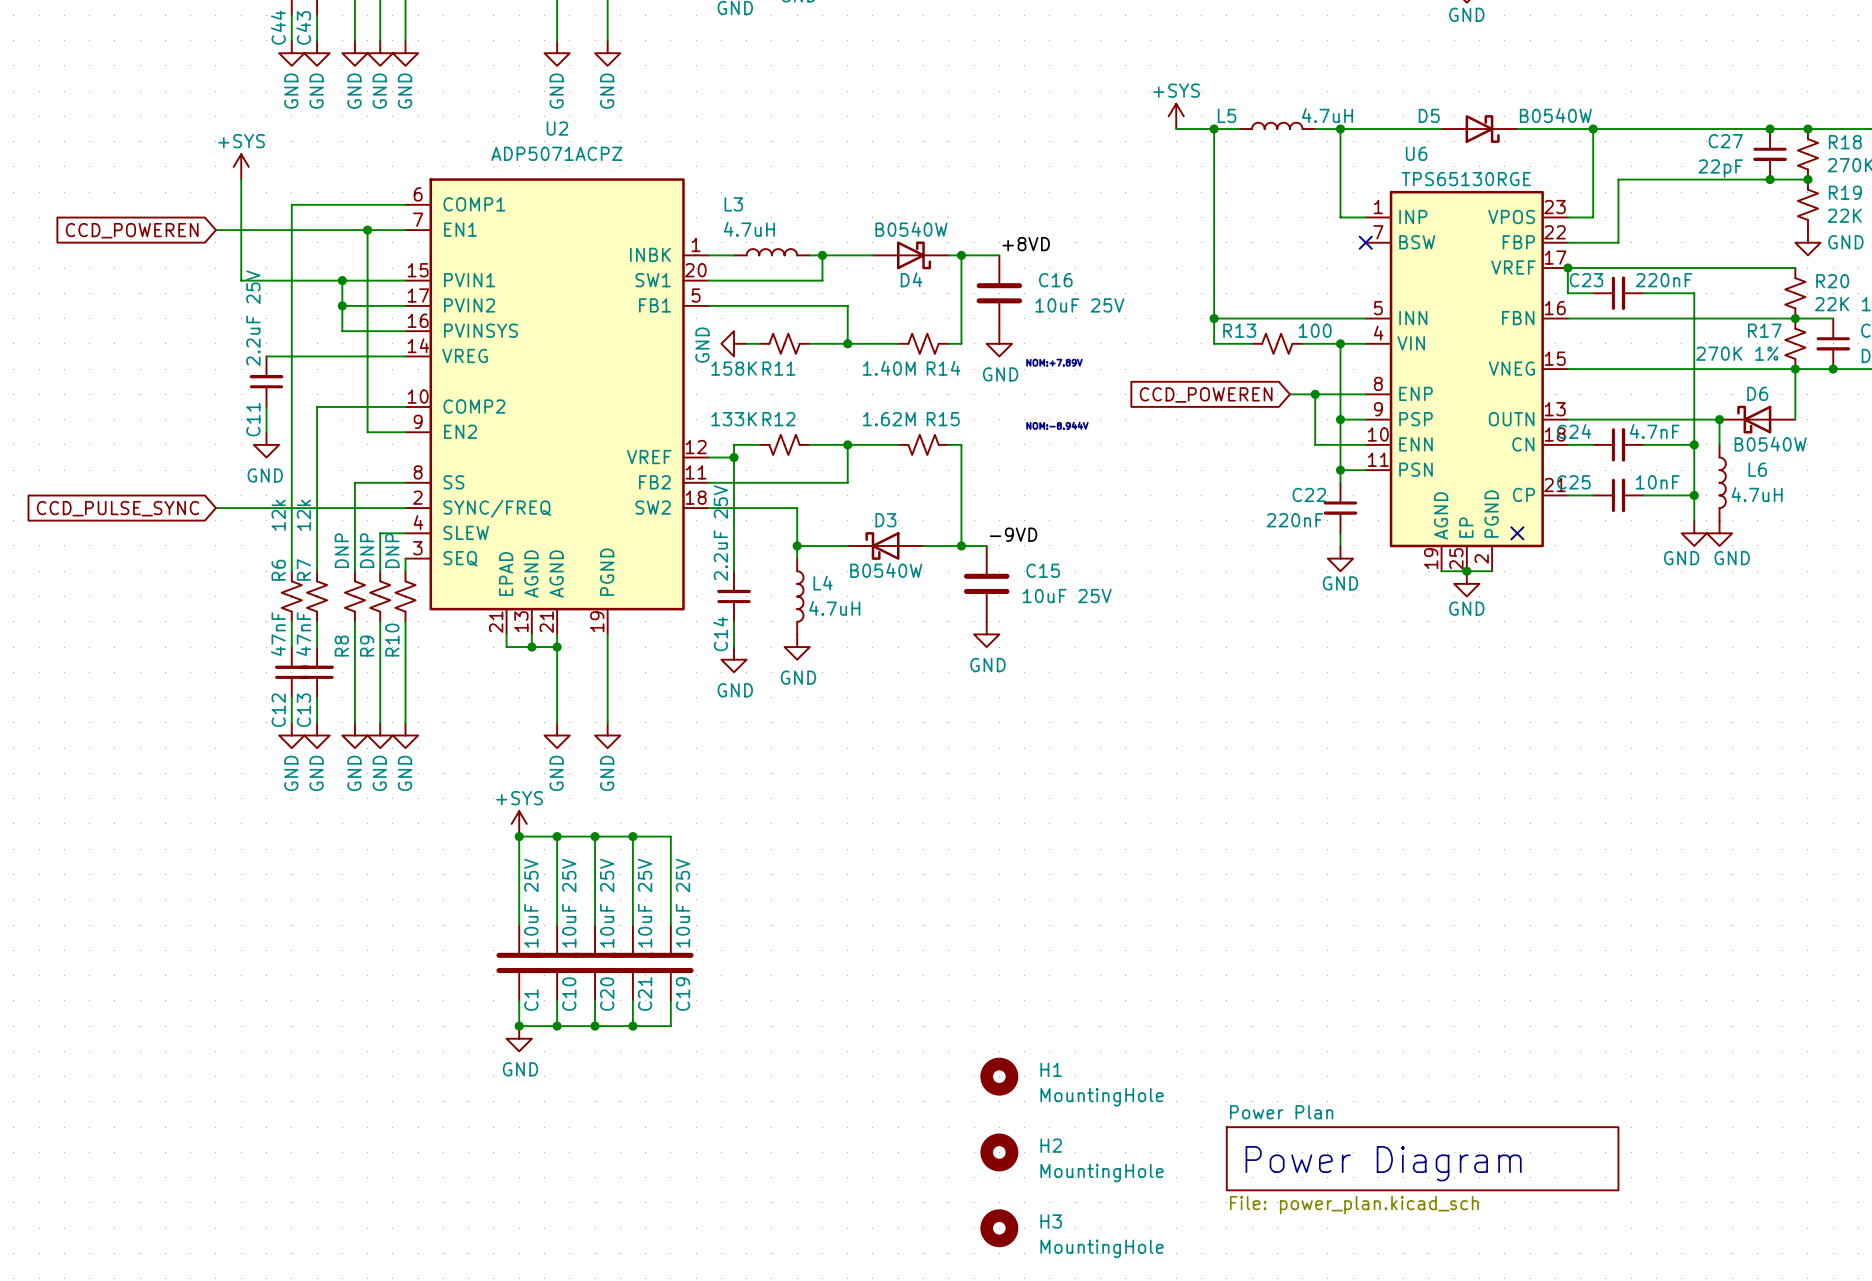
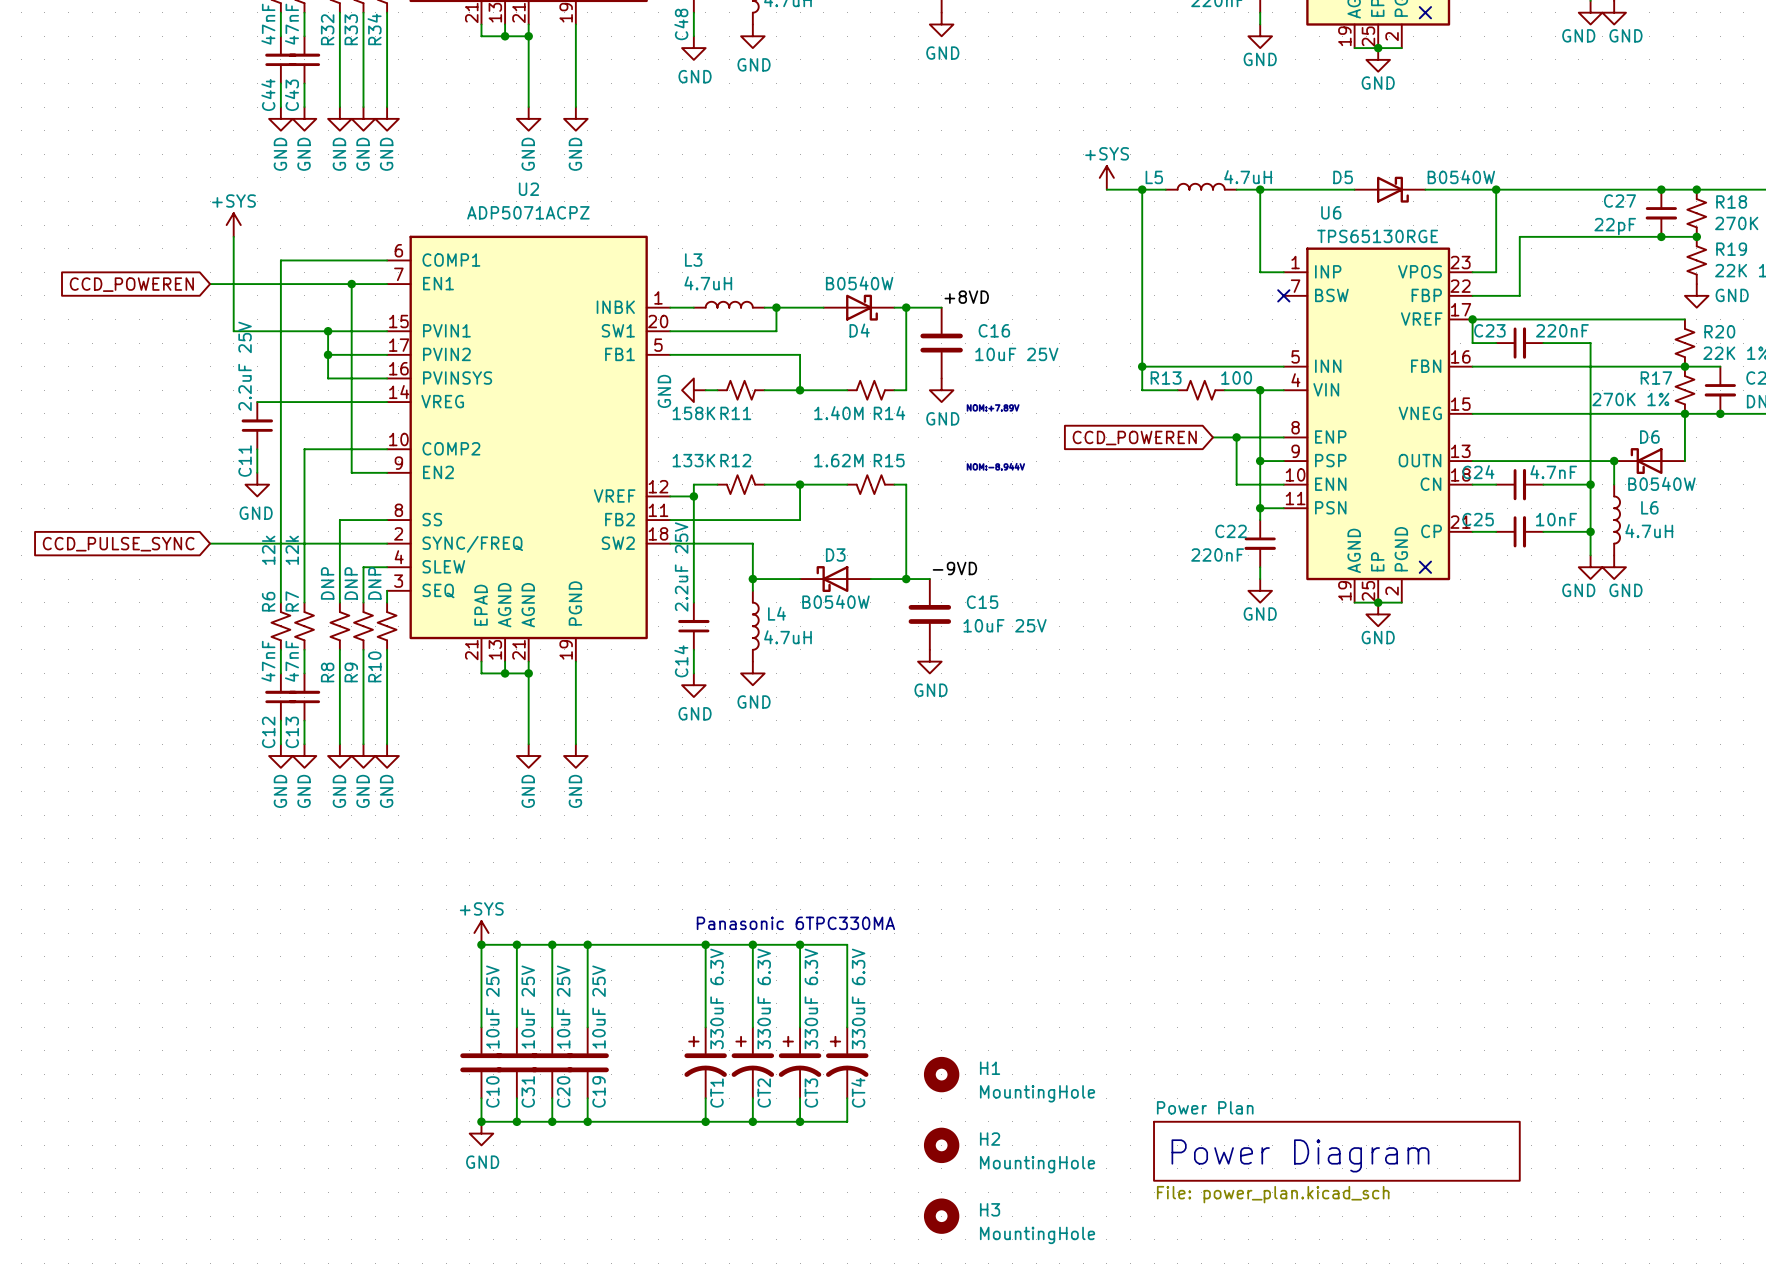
power symbol position: +SYS (519, 823) -> +SYS (481, 933)
junction: (519, 836) -> none
wire: (557, 836) (557, 925) -> (516, 944) (516, 1027)
junction: (557, 836) -> none
wire: (595, 836) (595, 925) -> (552, 944) (552, 1027)
junction: (595, 836) -> none
wire: (632, 836) (632, 925) -> (587, 944) (587, 1027)
junction: (632, 836) -> none
text: none -> Panasonic 6TPC330MA (795, 923)
wire: (519, 925) (519, 836) (670, 836) (670, 925) -> none
junction: none -> (481, 944)
junction: none -> (516, 944)
junction: none -> (552, 944)
junction: none -> (587, 944)
wire: none -> (705, 944) (705, 1027)
junction: none -> (705, 944)
wire: none -> (752, 944) (752, 1027)
junction: none -> (752, 944)
wire: none -> (800, 944) (800, 1027)
junction: none -> (800, 944)
C1: 10uF 25V (519, 962) -> none
C10 position: (557, 962) -> (481, 1062)
C20 position: (595, 962) -> (552, 1062)
C21: 10uF 25V (632, 962) -> none
C19 position: (670, 962) -> (587, 1062)
wire: (519, 1000) (519, 1026) (670, 1026) (670, 1000) -> none
wire: (557, 1000) (557, 1026) -> (516, 1098) (516, 1121)
wire: (595, 1000) (595, 1026) -> (552, 1098) (552, 1121)
wire: (632, 1000) (632, 1026) -> (587, 1098) (587, 1121)
wire: none -> (481, 1027) (481, 944) (847, 944) (847, 1027)
junction: (519, 1026) -> none
junction: (557, 1026) -> none
junction: (595, 1026) -> none
junction: (632, 1026) -> none
power symbol position: GND (519, 1038) -> GND (481, 1133)
C31: none -> 10uF 25V (516, 1062)
CT1: none -> 330uF 6.3V (705, 1062)
CT2: none -> 330uF 6.3V (752, 1062)
CT3: none -> 330uF 6.3V (800, 1062)
CT4: none -> 330uF 6.3V (847, 1062)
wire: none -> (481, 1098) (481, 1121) (847, 1121) (847, 1098)
wire: none -> (705, 1098) (705, 1121)
wire: none -> (752, 1098) (752, 1121)
wire: none -> (800, 1098) (800, 1121)
junction: none -> (481, 1121)
junction: none -> (516, 1121)
junction: none -> (552, 1121)
junction: none -> (587, 1121)
junction: none -> (705, 1121)
junction: none -> (752, 1121)
junction: none -> (800, 1121)

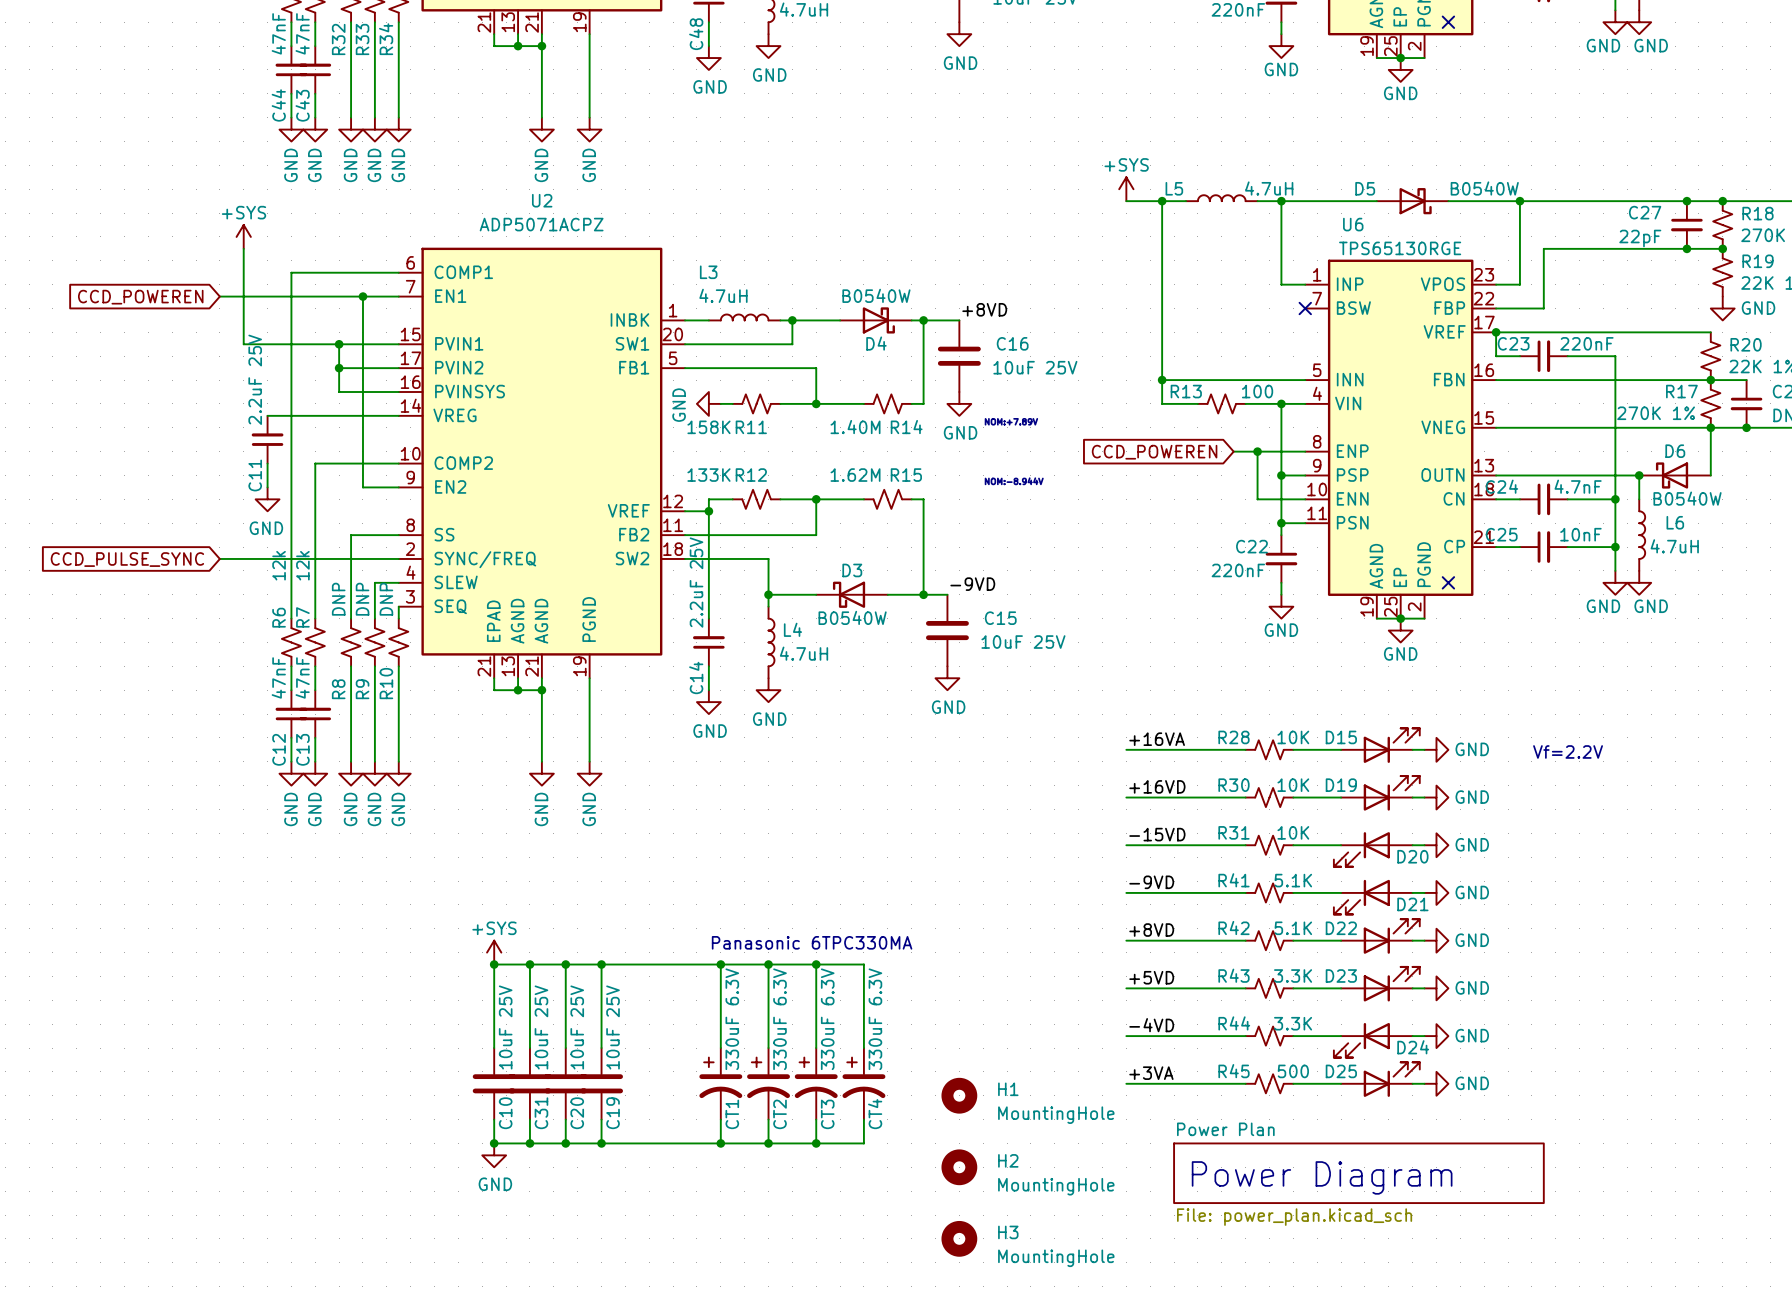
label: none -> +16VA (1157, 739)
D15: none -> (1380, 745)
wire: none -> (1126, 749) (1245, 749)
R28: none -> 10K (1269, 749)
wire: none -> (1293, 749) (1341, 749)
wire: none -> (1412, 749) (1424, 749)
power symbol: none -> GND (1436, 749)
text: none -> Vf=2.2V (1568, 751)
label: none -> +16VD (1157, 786)
D19: none -> (1380, 793)
wire: none -> (1126, 797) (1245, 797)
R30: none -> 10K (1269, 797)
wire: none -> (1293, 797) (1341, 797)
wire: none -> (1412, 797) (1424, 797)
power symbol: none -> GND (1436, 797)
label: none -> -15VD (1157, 834)
wire: none -> (1126, 845) (1245, 845)
R31: none -> 10K (1269, 845)
wire: none -> (1293, 845) (1341, 845)
wire: none -> (1412, 845) (1424, 845)
power symbol: none -> GND (1436, 845)
D20: none -> (1373, 849)
label: none -> -9VD (1151, 882)
wire: none -> (1126, 892) (1245, 892)
R41: none -> 5.1K (1269, 892)
wire: none -> (1293, 892) (1341, 892)
wire: none -> (1412, 892) (1424, 892)
power symbol: none -> GND (1436, 892)
D21: none -> (1373, 897)
label: none -> +8VD (1151, 930)
D22: none -> (1380, 936)
wire: none -> (1126, 940) (1245, 940)
R42: none -> 5.1K (1269, 940)
wire: none -> (1293, 940) (1341, 940)
wire: none -> (1412, 940) (1424, 940)
power symbol: none -> GND (1436, 940)
label: none -> +5VD (1151, 977)
D23: none -> (1380, 984)
wire: none -> (1126, 988) (1245, 988)
R43: none -> 3.3K (1269, 988)
wire: none -> (1293, 988) (1341, 988)
wire: none -> (1412, 988) (1424, 988)
power symbol: none -> GND (1436, 988)
label: none -> -4VD (1151, 1025)
wire: none -> (1126, 1036) (1245, 1036)
R44: none -> 3.3K (1269, 1036)
wire: none -> (1293, 1036) (1341, 1036)
wire: none -> (1412, 1036) (1424, 1036)
power symbol: none -> GND (1436, 1036)
D24: none -> (1373, 1040)
label: none -> +3VA (1151, 1073)
D25: none -> (1380, 1079)
wire: none -> (1126, 1083) (1245, 1083)
R45: none -> 500 (1269, 1083)
wire: none -> (1293, 1083) (1341, 1083)
wire: none -> (1412, 1083) (1424, 1083)
power symbol: none -> GND (1436, 1083)

